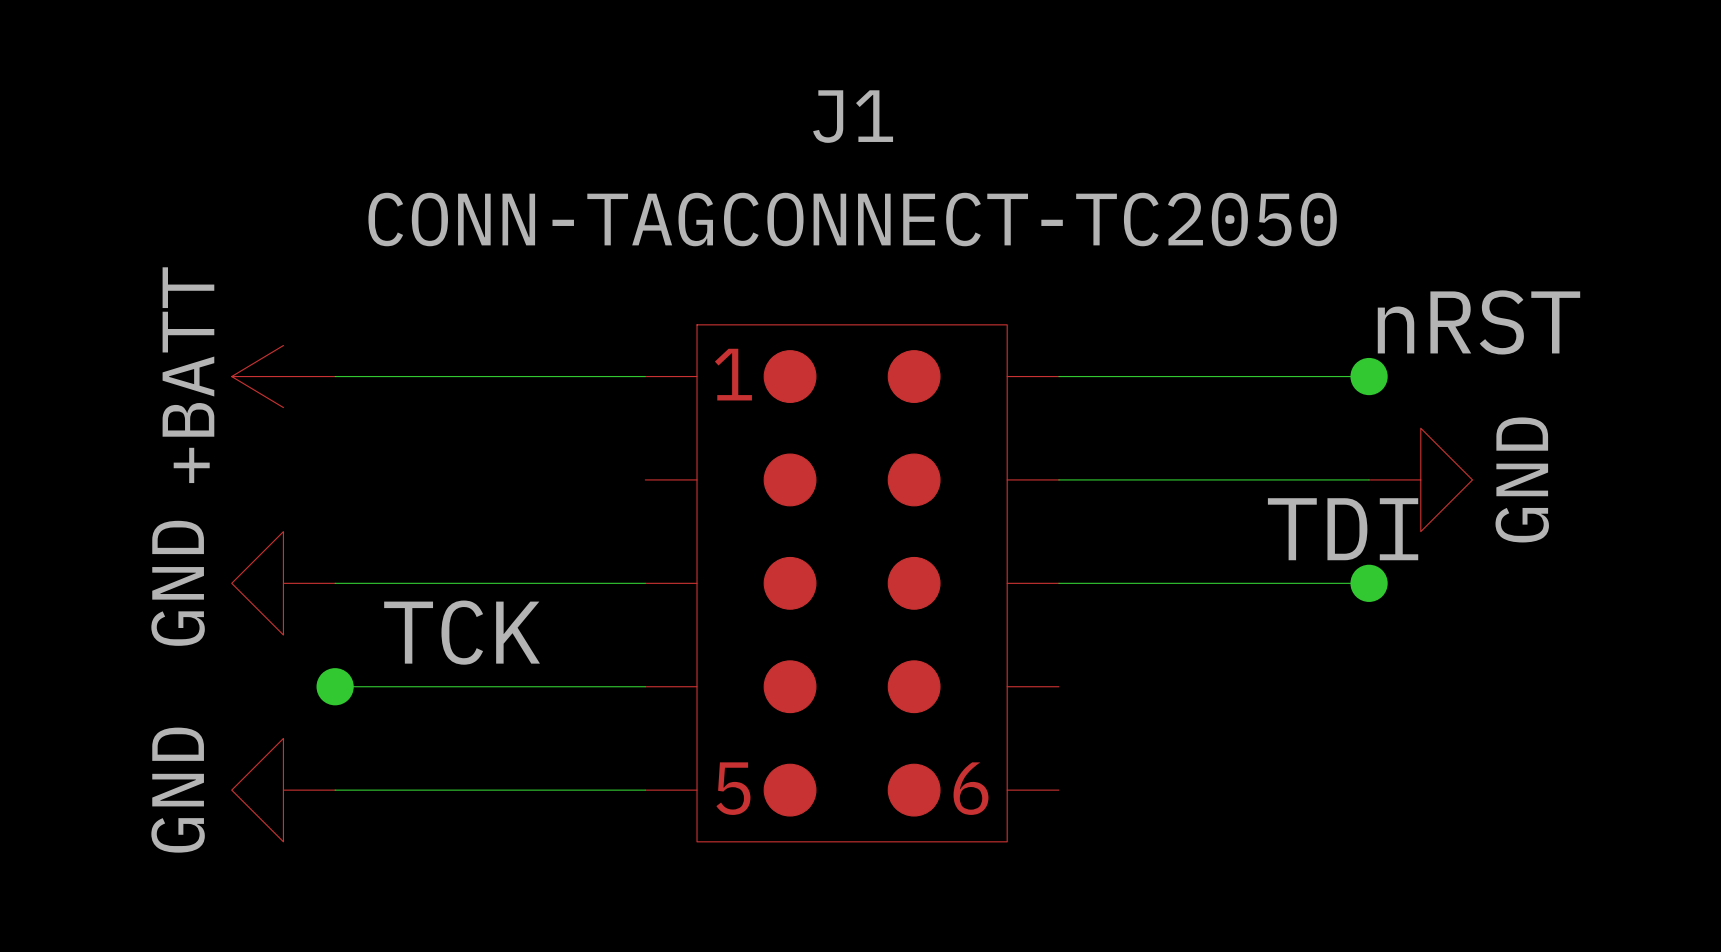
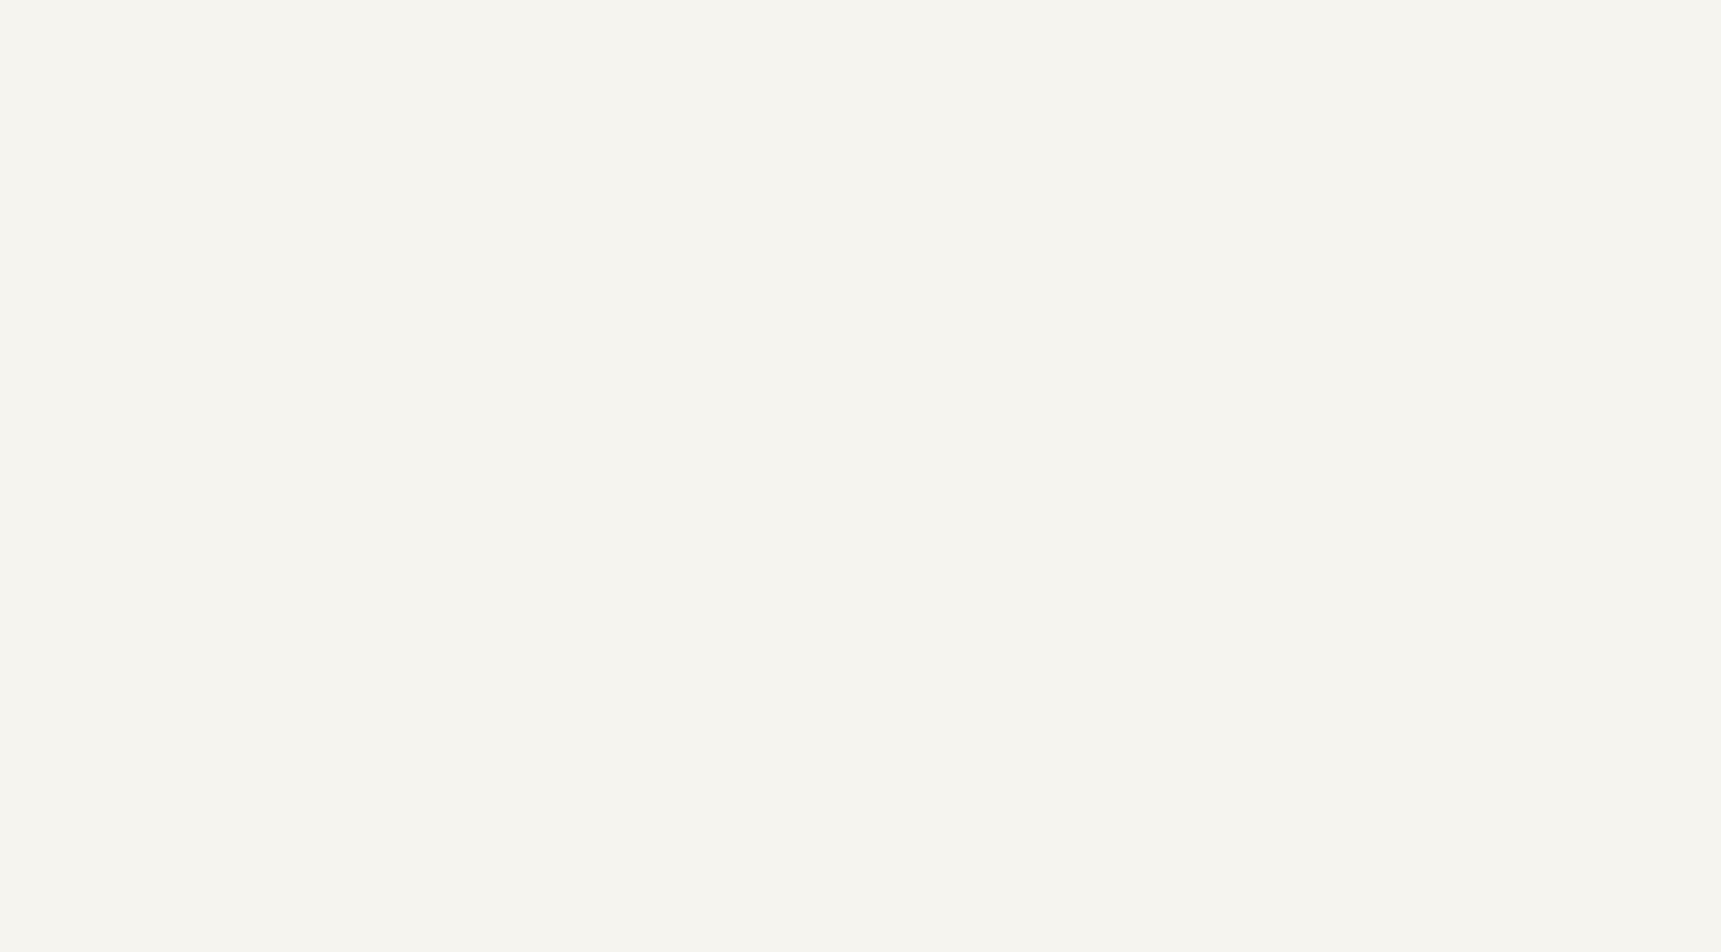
label: nRST (1478, 322) -> none
power symbol: +BATT (283, 376) -> none
wire: (335, 376) (645, 376) -> none
wire: (1058, 376) (1369, 376) -> none
junction: (1369, 376) -> none
wire: (1058, 479) (1369, 479) -> none
power symbol: GND (1420, 479) -> none
label: TDI (1343, 529) -> none
power symbol: GND (283, 583) -> none
wire: (335, 583) (645, 583) -> none
J1: CONN-TAGCONNECT-TC2050 (852, 583) -> none
wire: (1058, 583) (1369, 583) -> none
junction: (1369, 583) -> none
label: TCK (462, 632) -> none
wire: (335, 686) (645, 686) -> none
junction: (335, 686) -> none
power symbol: GND (283, 790) -> none
wire: (335, 790) (645, 790) -> none

